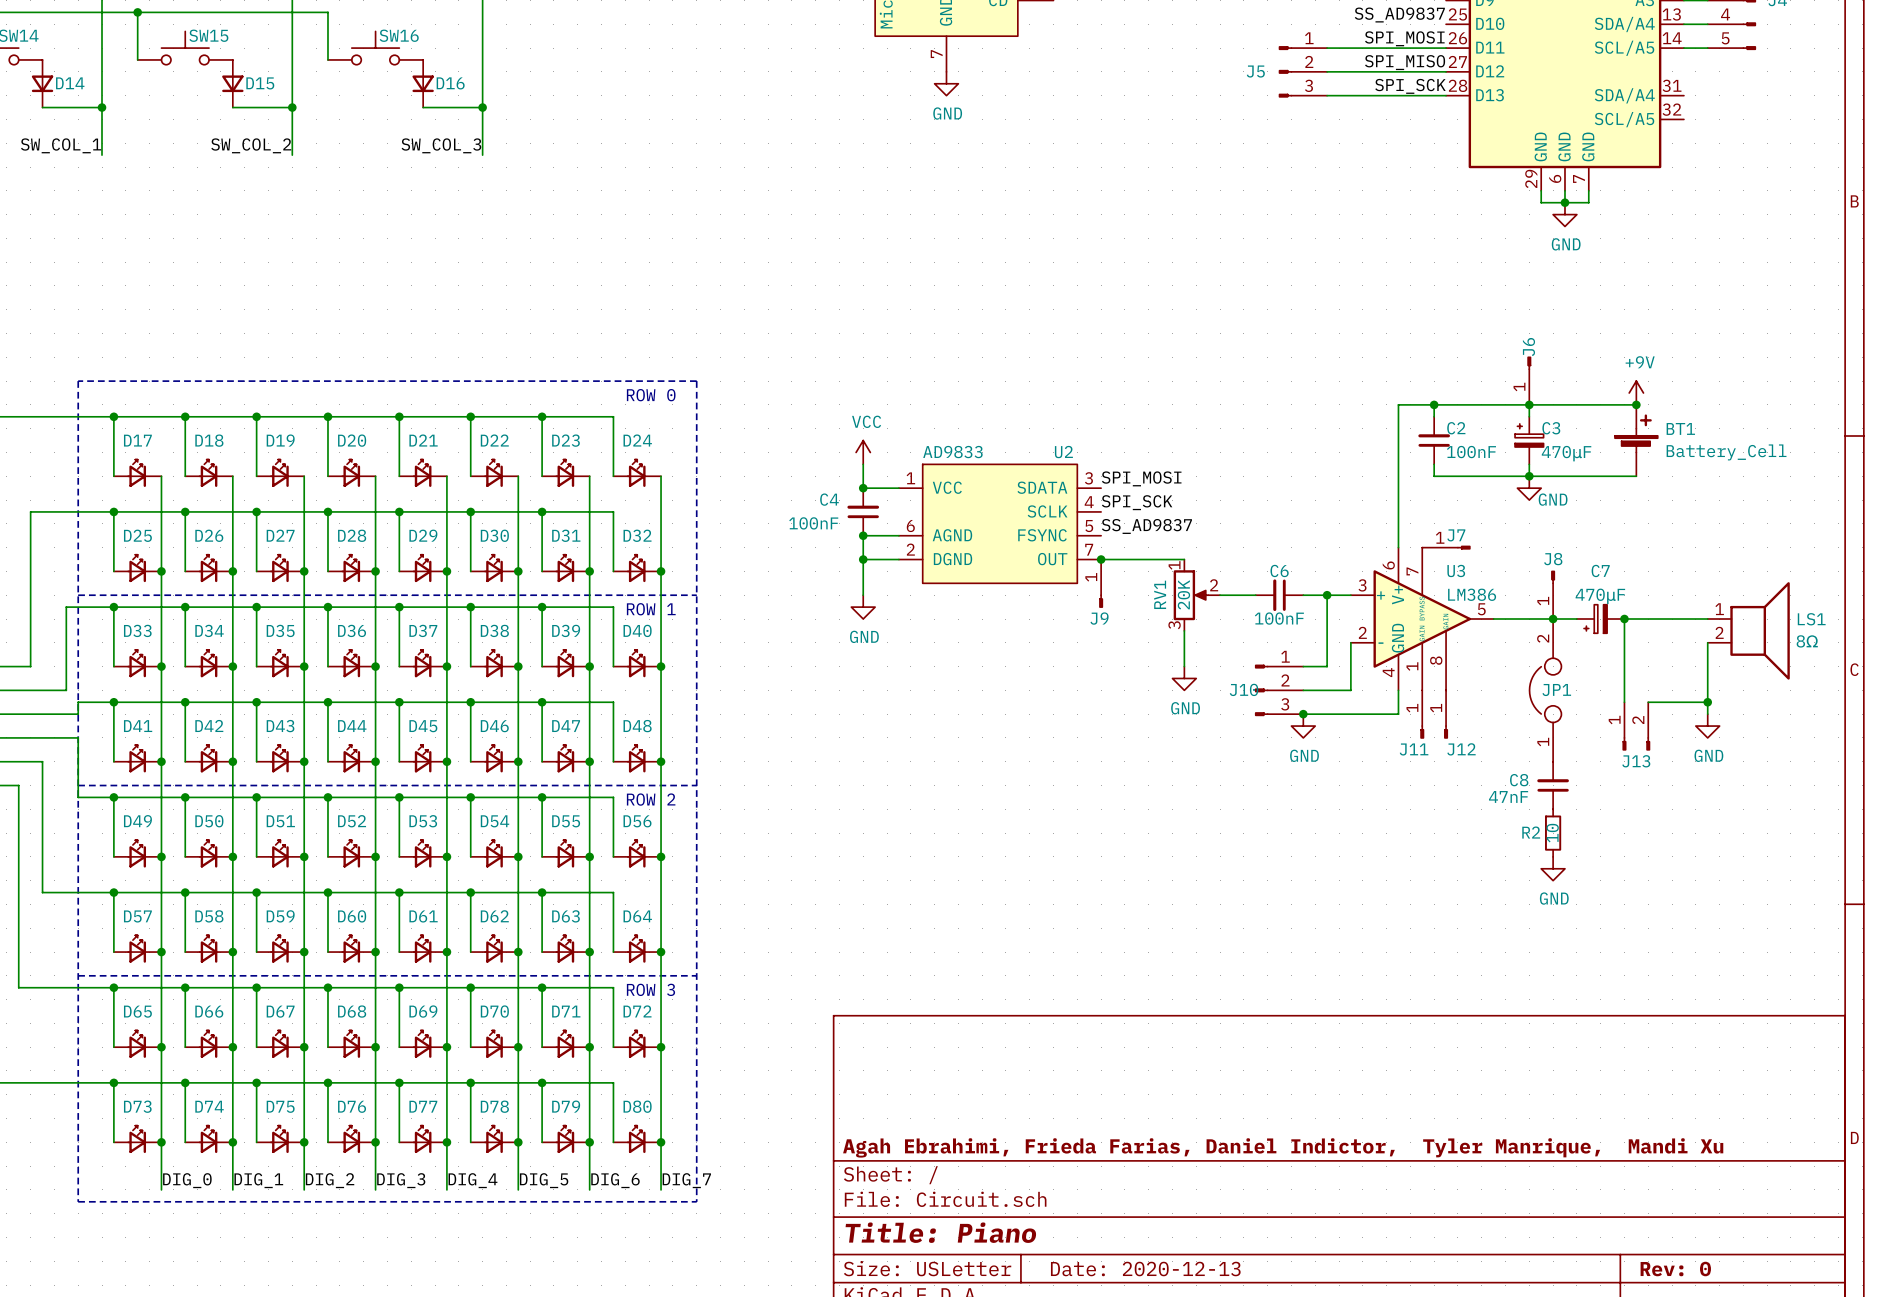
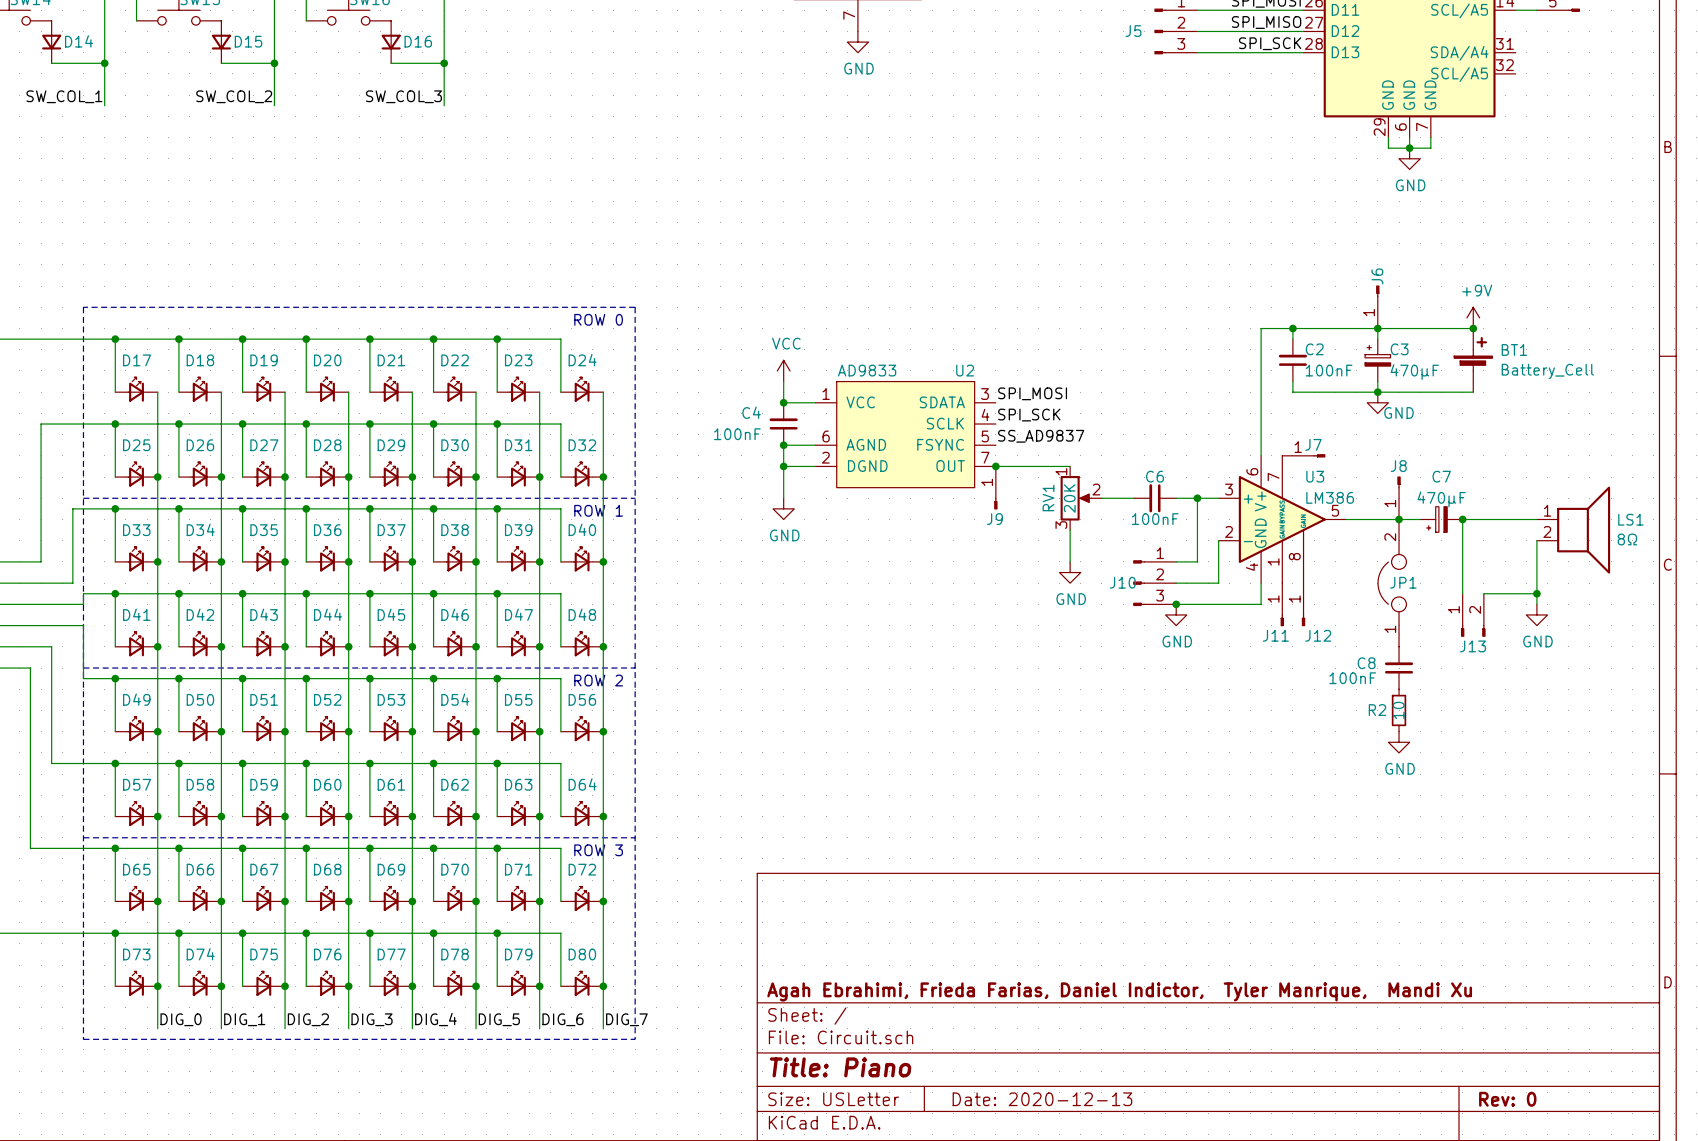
C8 value: 47nF (1508, 796) -> 100nF (1352, 678)

